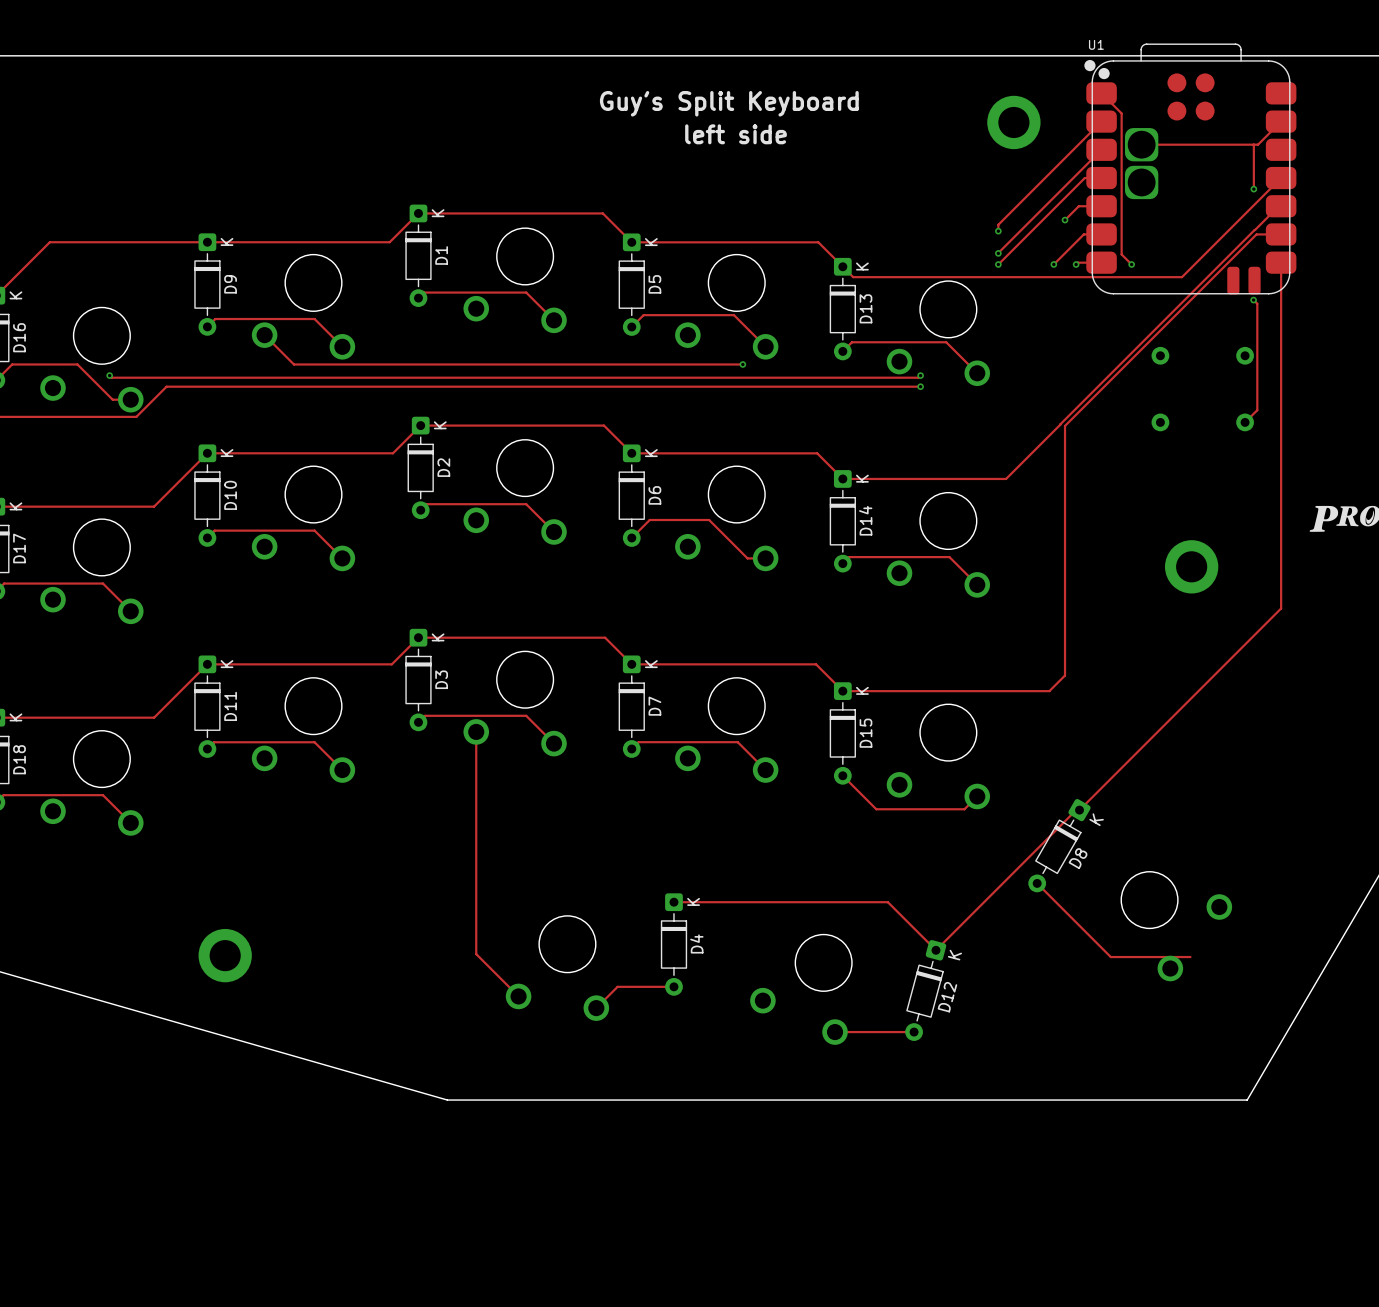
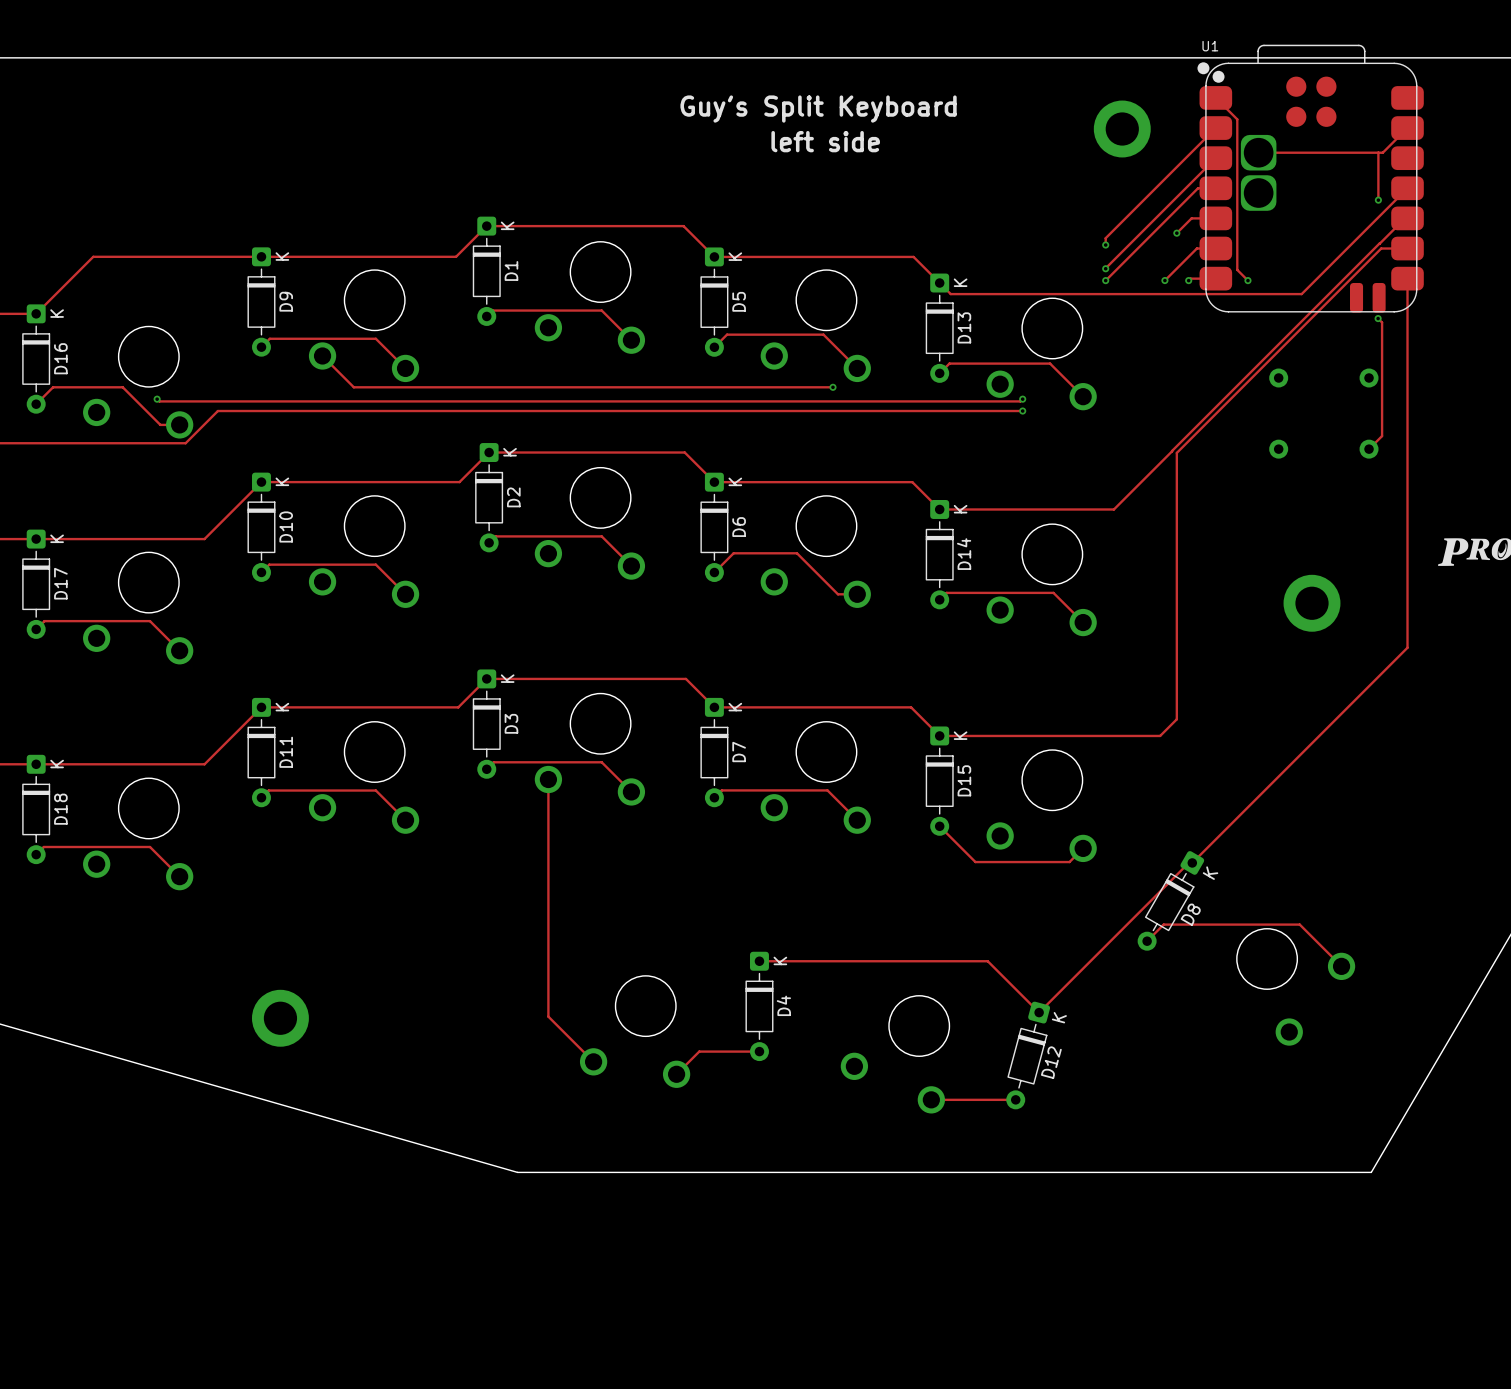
track: (1037, 883) (1110, 957) (1190, 957) -> (1147, 941) (1163, 924) (1299, 924) (1341, 966)

